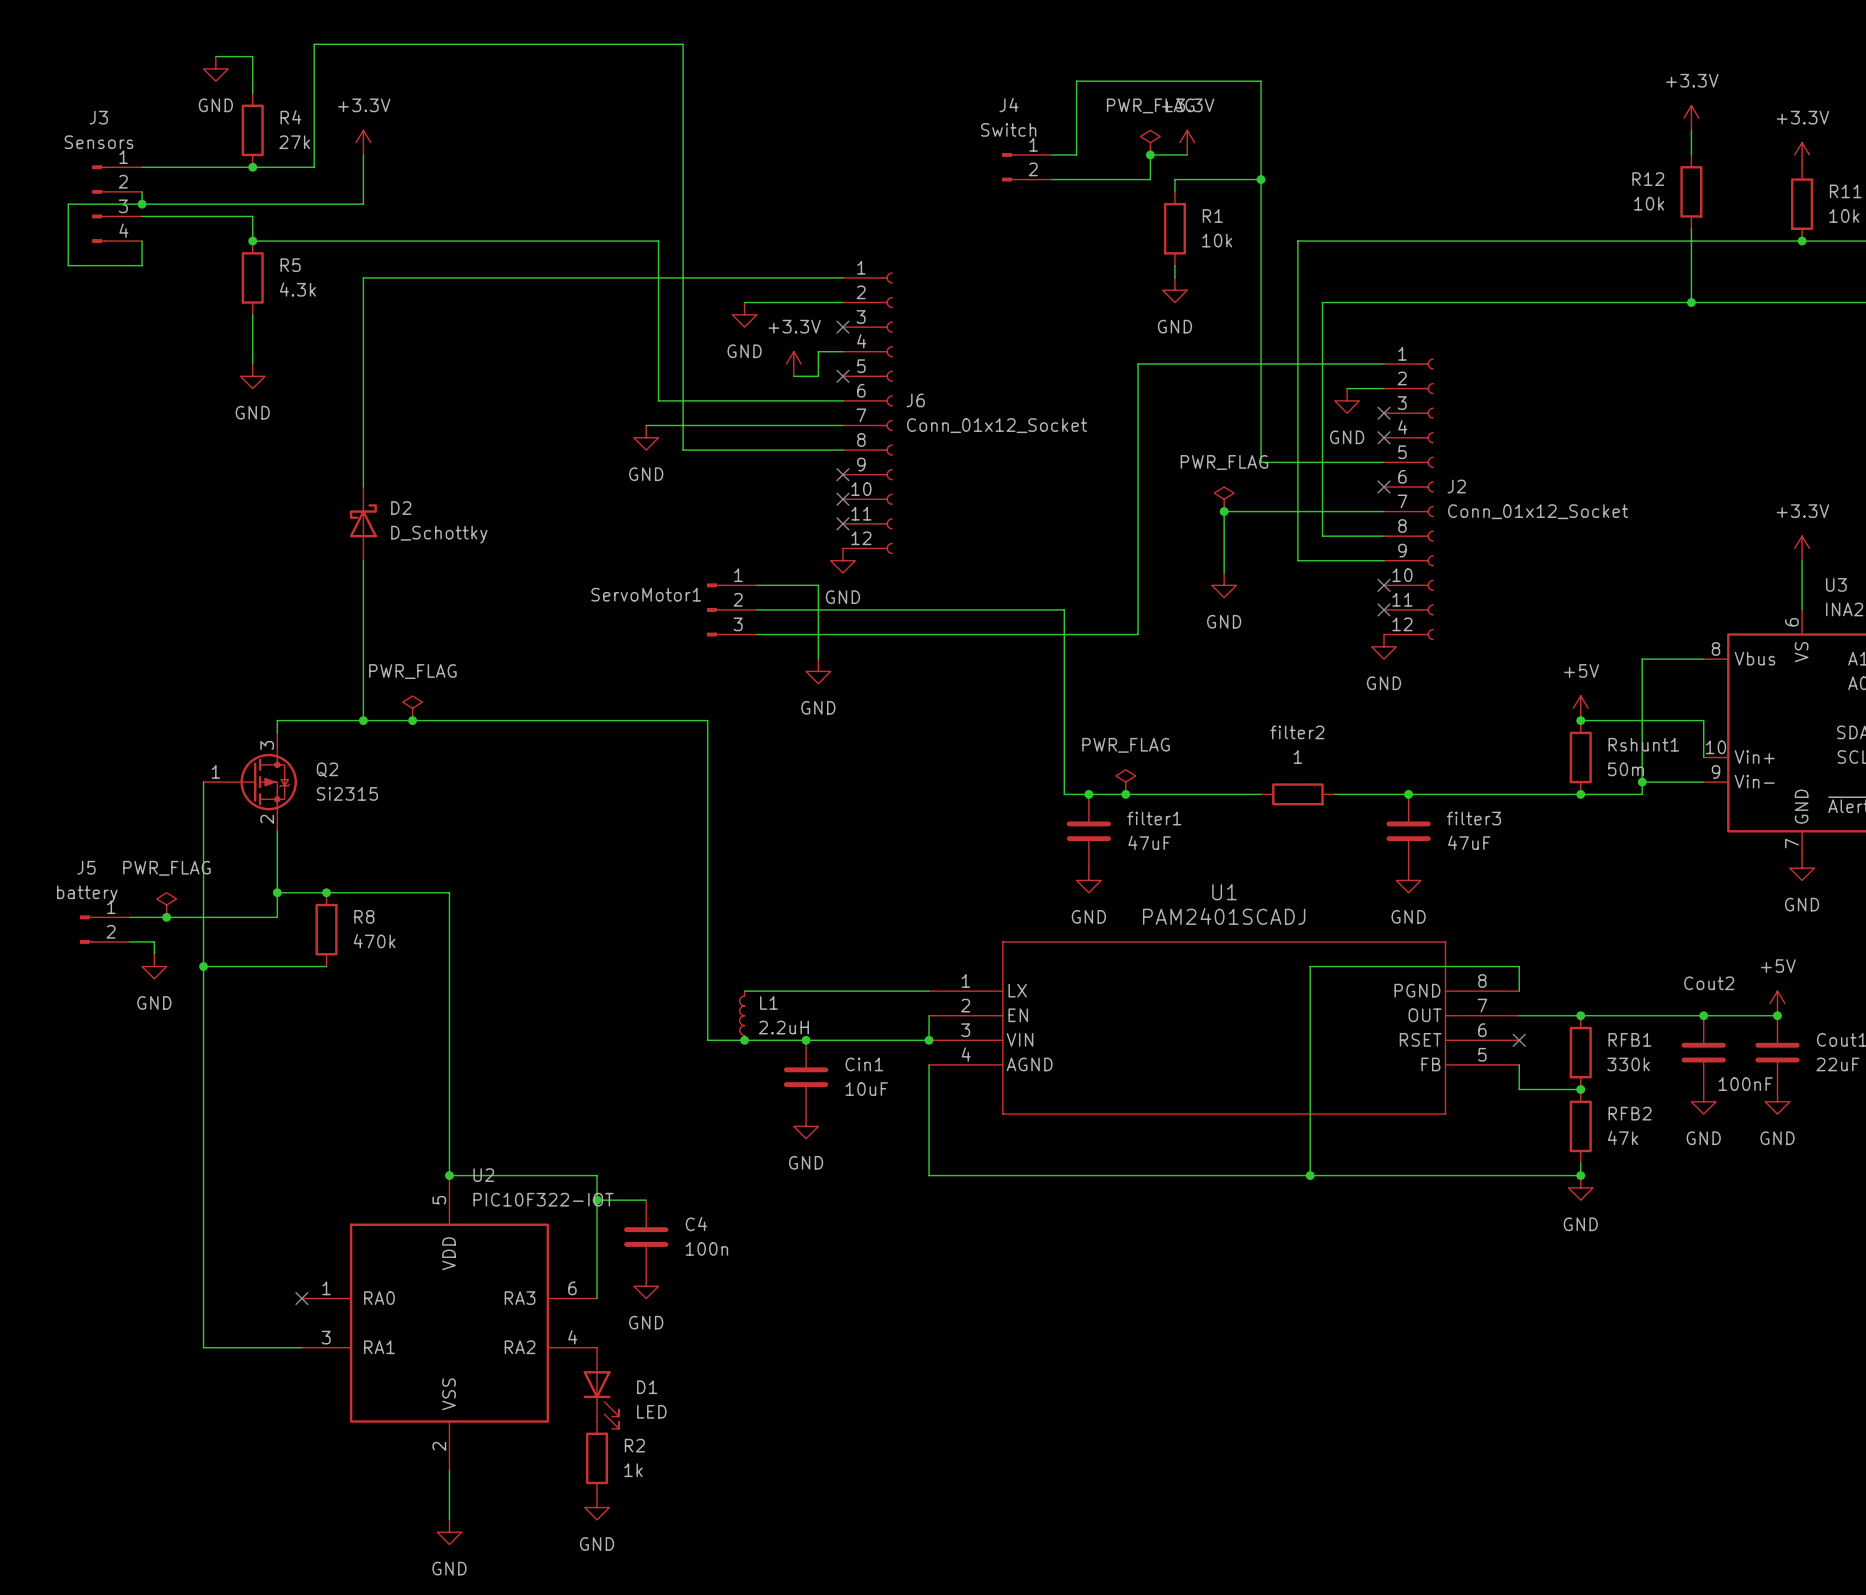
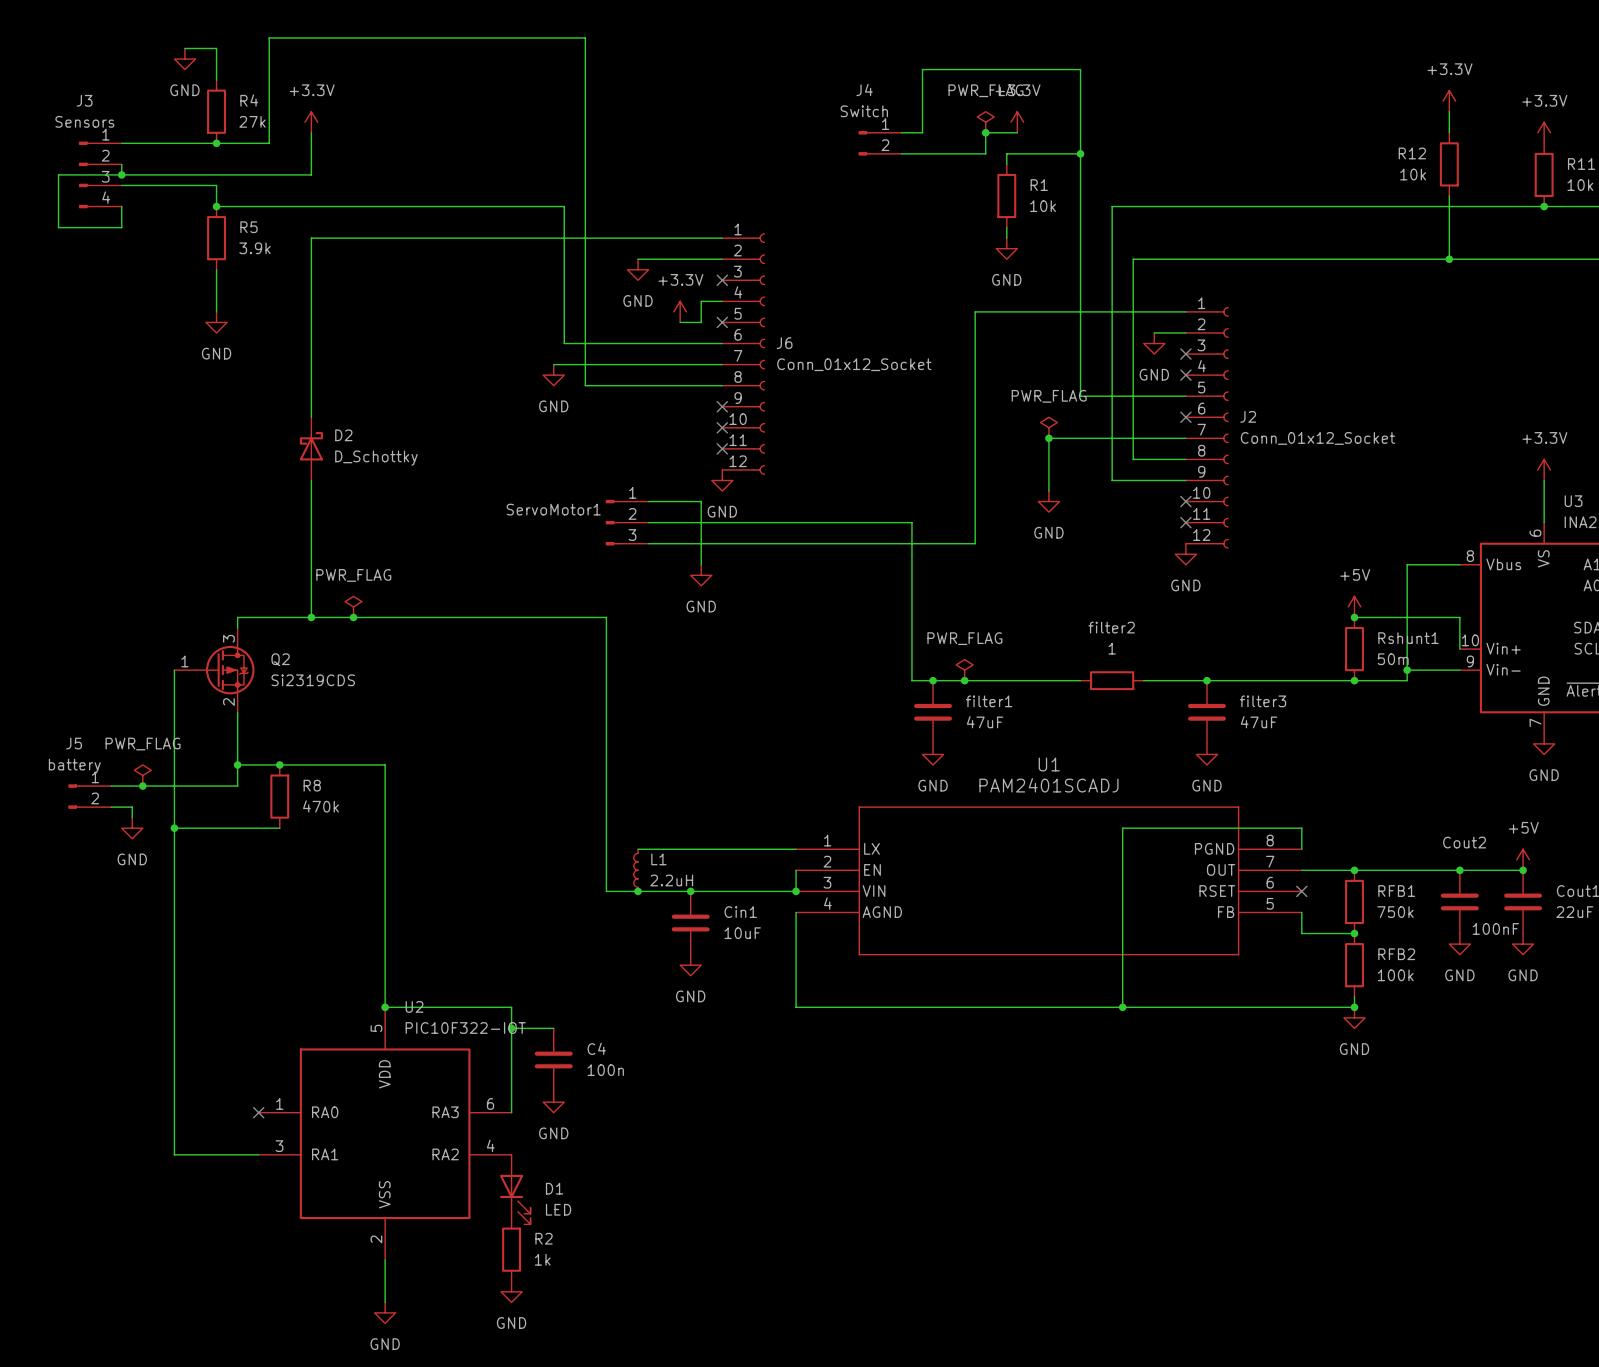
R5 value: 4.3k (297, 289) -> 3.9k (255, 248)
Q2 value: Si2315 (347, 793) -> Si2319CDS (313, 680)
RFB1 value: 330k (1628, 1064) -> 750k (1395, 912)
RFB2 value: 47k (1623, 1137) -> 100k (1395, 975)

